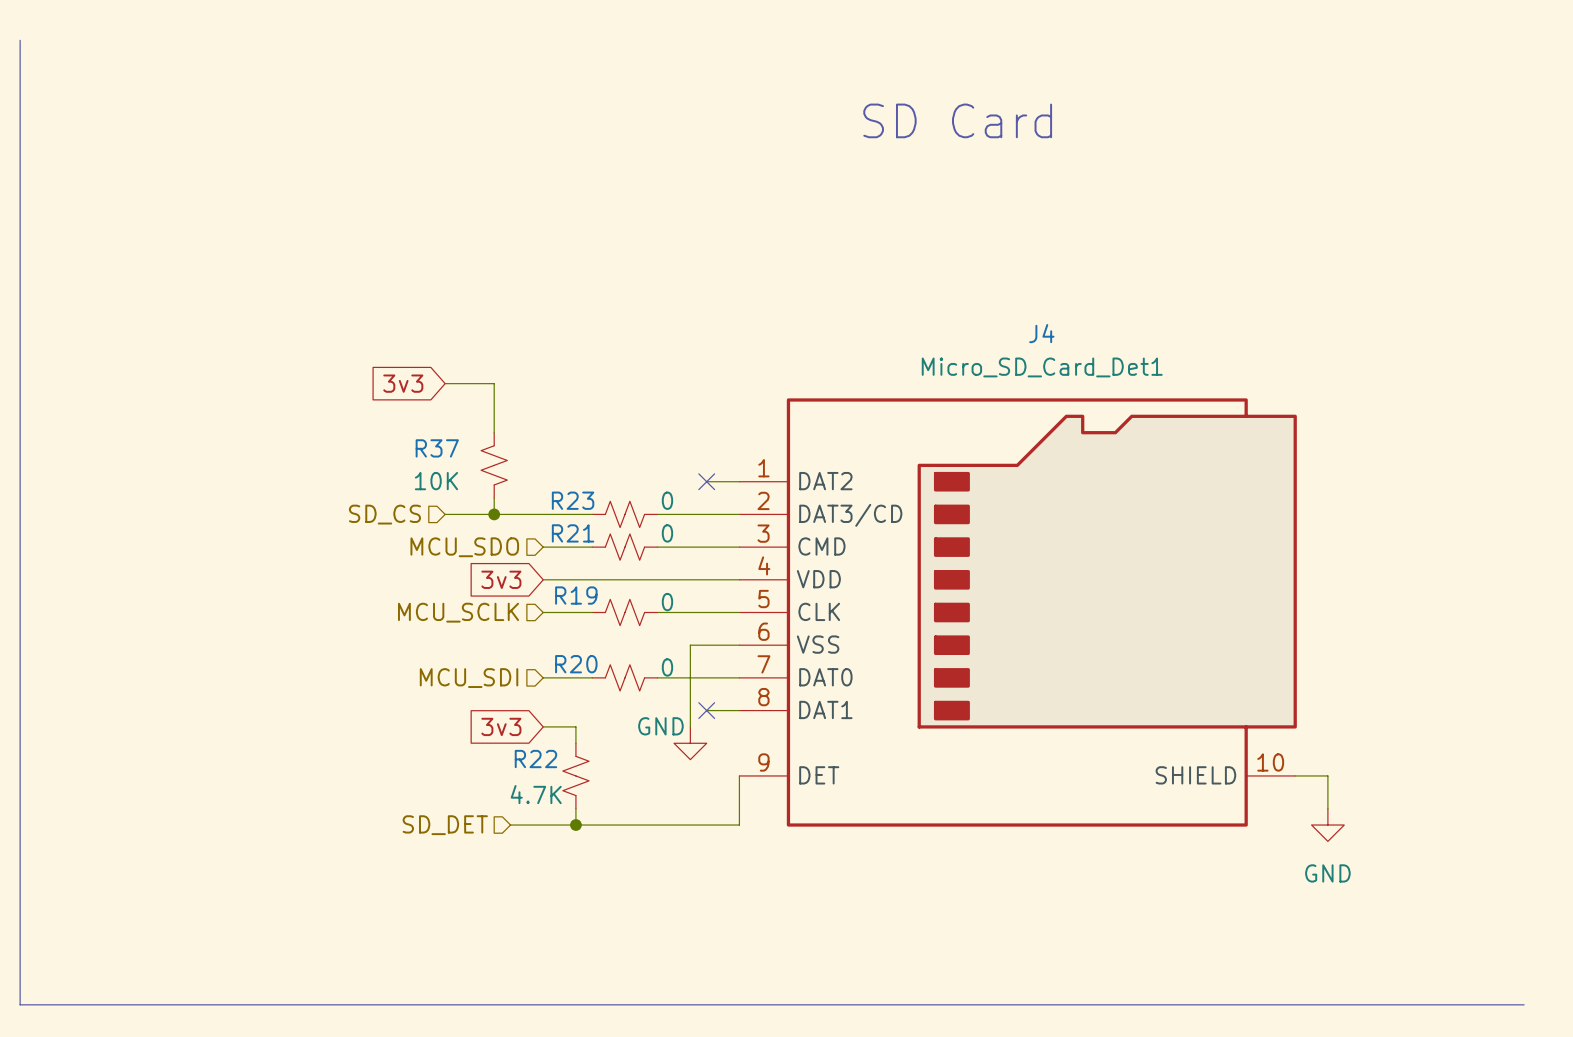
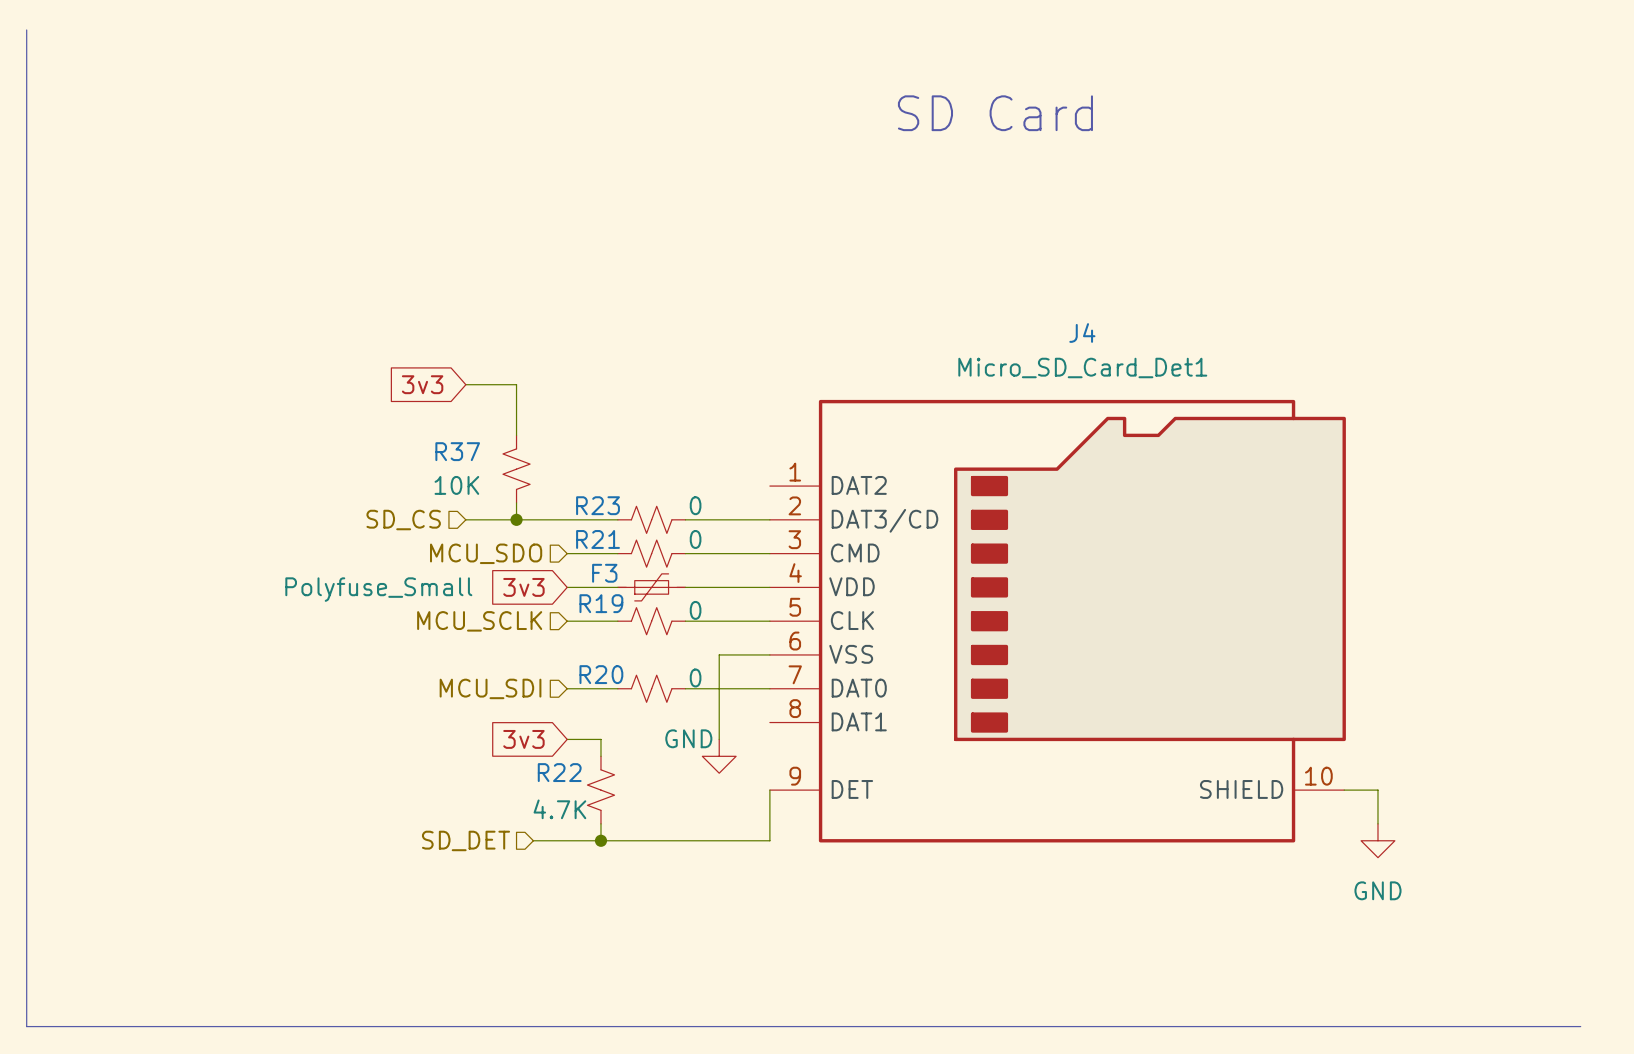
wire: (706, 481) (739, 481) -> none
no-connect mark: (706, 481) -> none
F3: none -> Polyfuse_Small (651, 587)
wire: (706, 710) (739, 710) -> none
no-connect mark: (706, 710) -> none

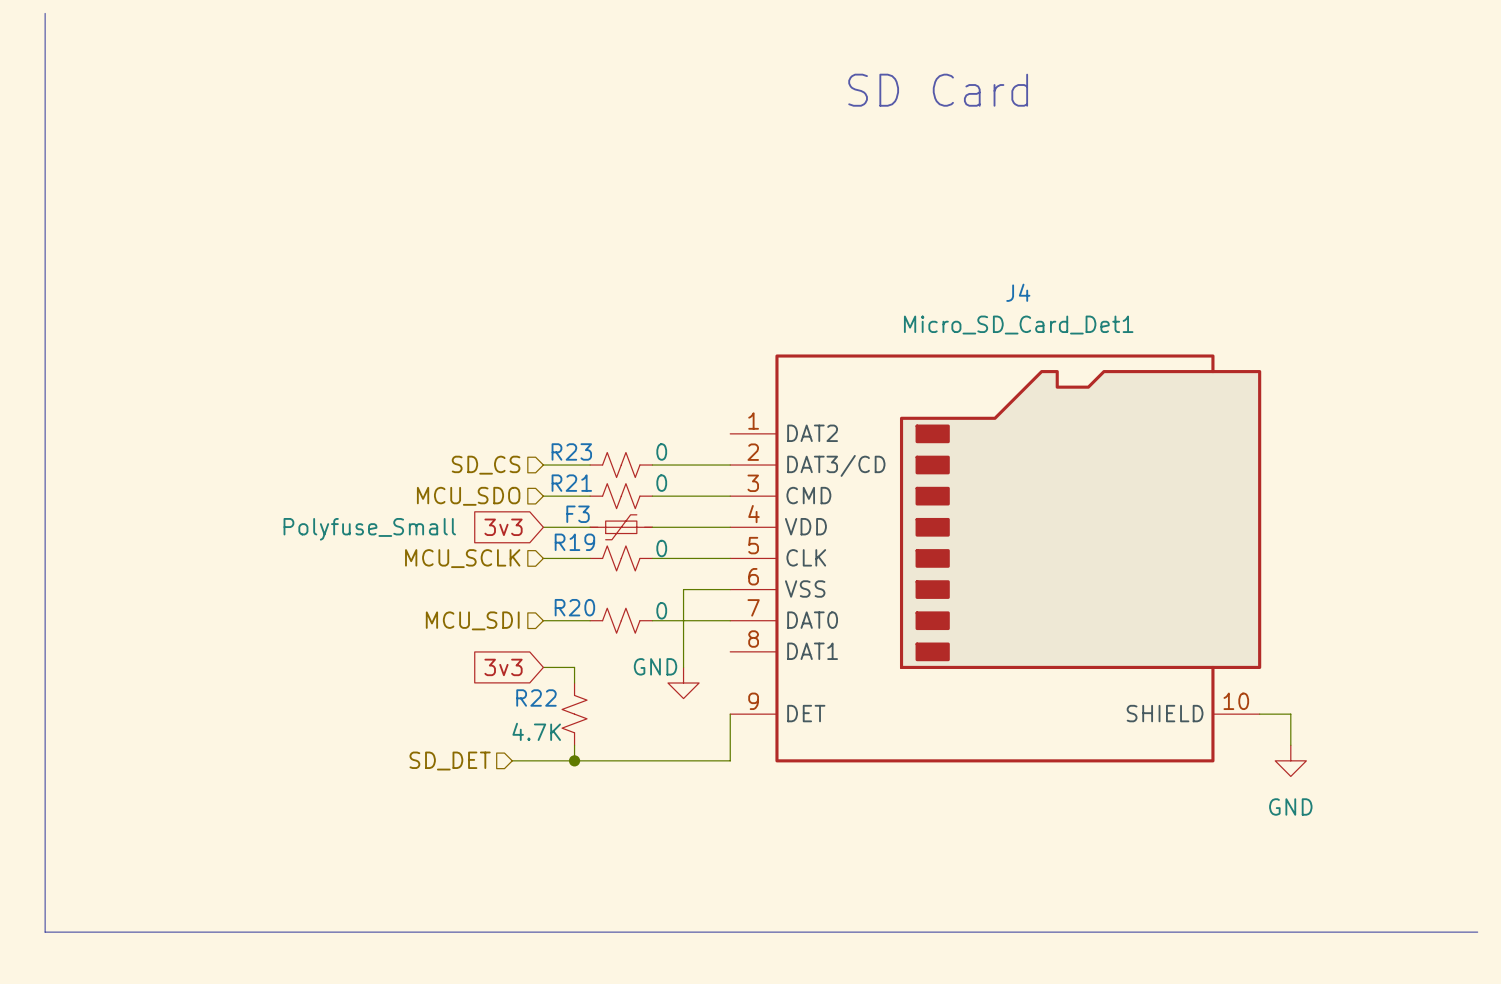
global label: 3v3 (422, 384) -> none
wire: (465, 384) (516, 384) (516, 435) -> none
R37: 10K (516, 469) -> none
wire: (516, 502) (516, 519) -> none
wire: (465, 519) (567, 519) -> none
junction: (516, 519) -> none
hierarchical label position: SD_CS (403, 520) -> SD_CS (486, 465)

